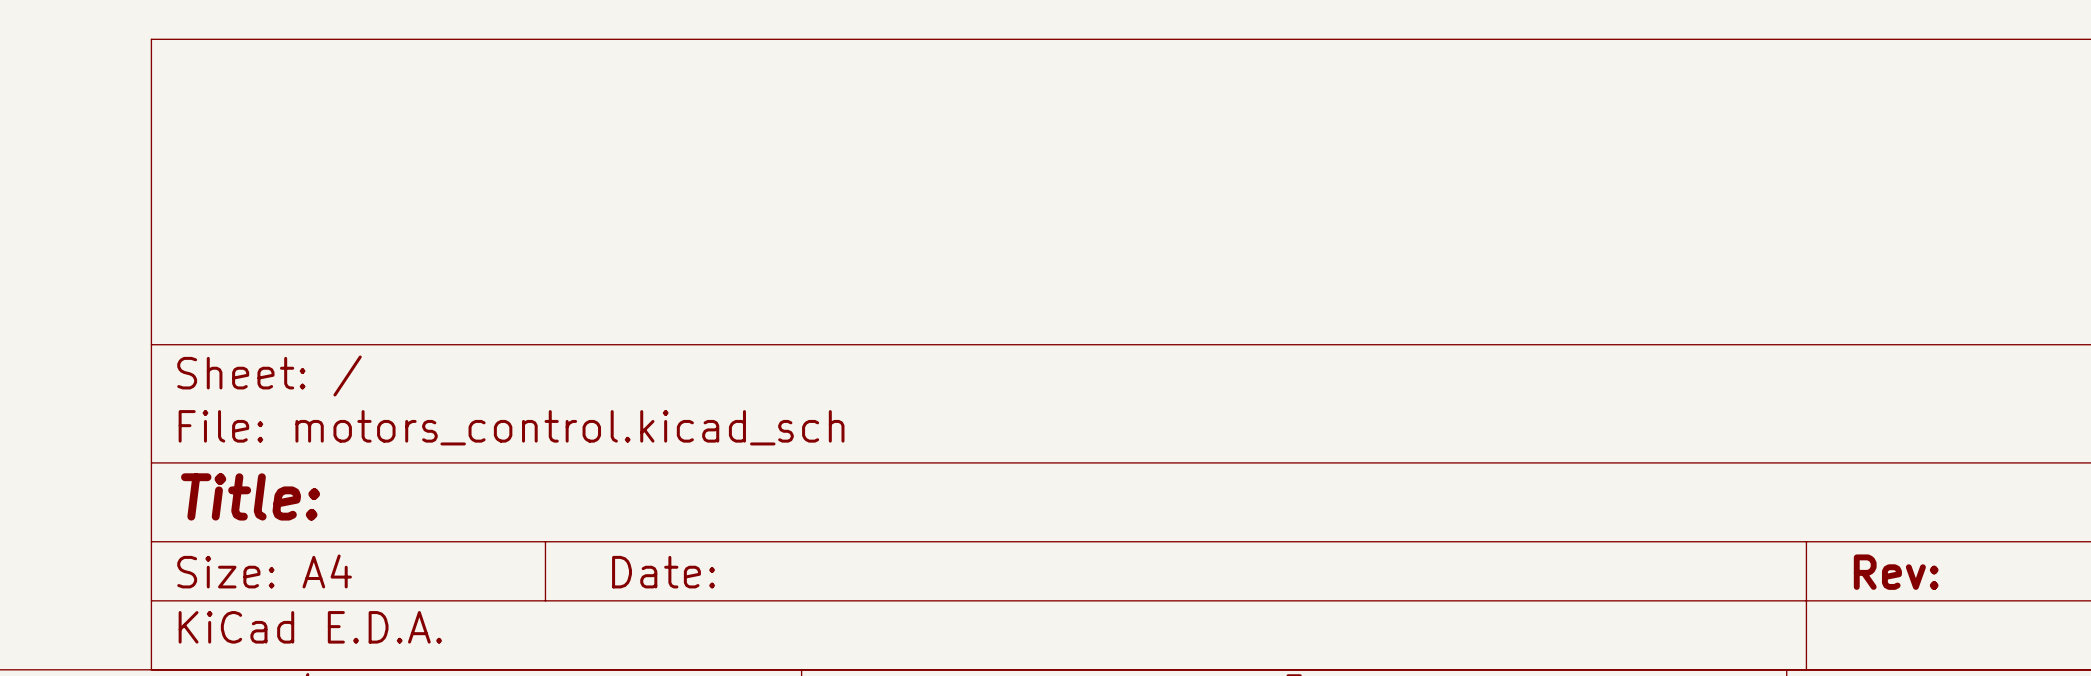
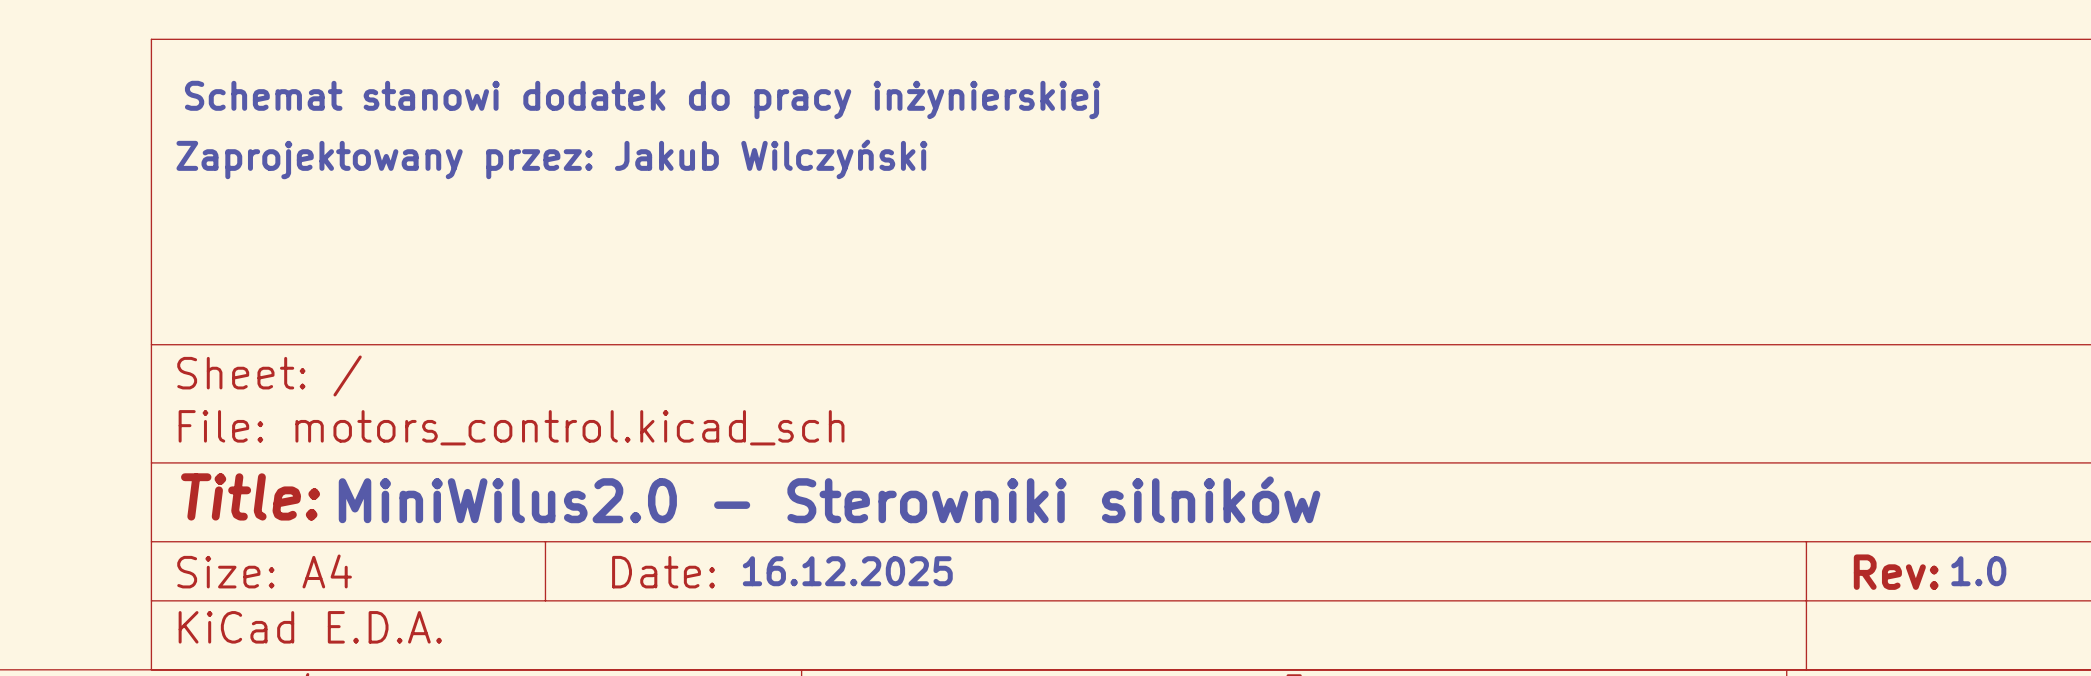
text: none -> Schemat stanowi dodatek do pracy inżynierskiej (642, 99)
text: none -> Zaprojektowany przez: Jakub Wilczyński (551, 159)
text: none -> MiniWilus2.0 - Sterowniki silników (829, 499)
text: none -> 16.12.2025 (847, 571)
text: none -> 1.0 (1978, 571)

